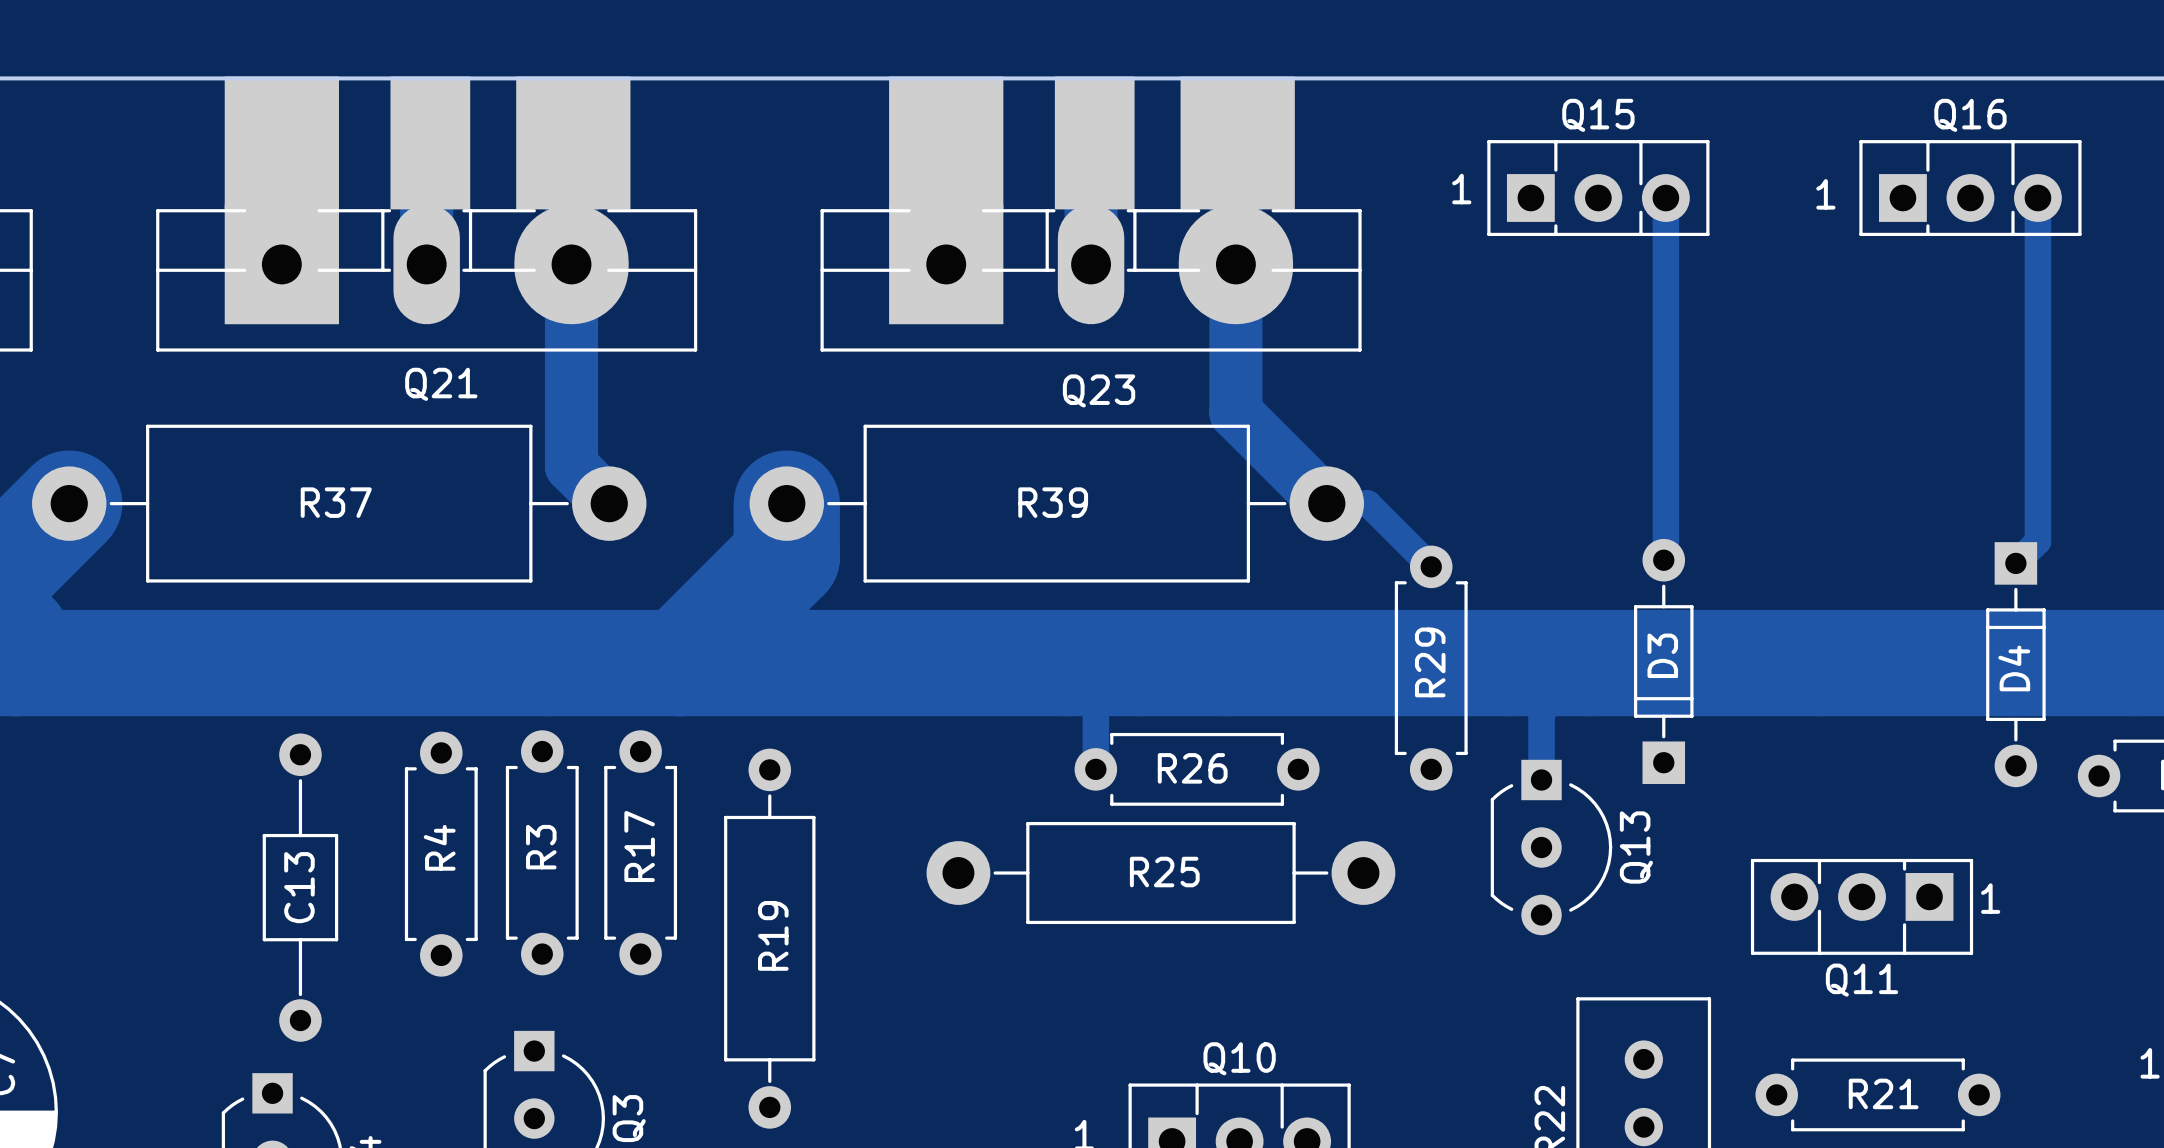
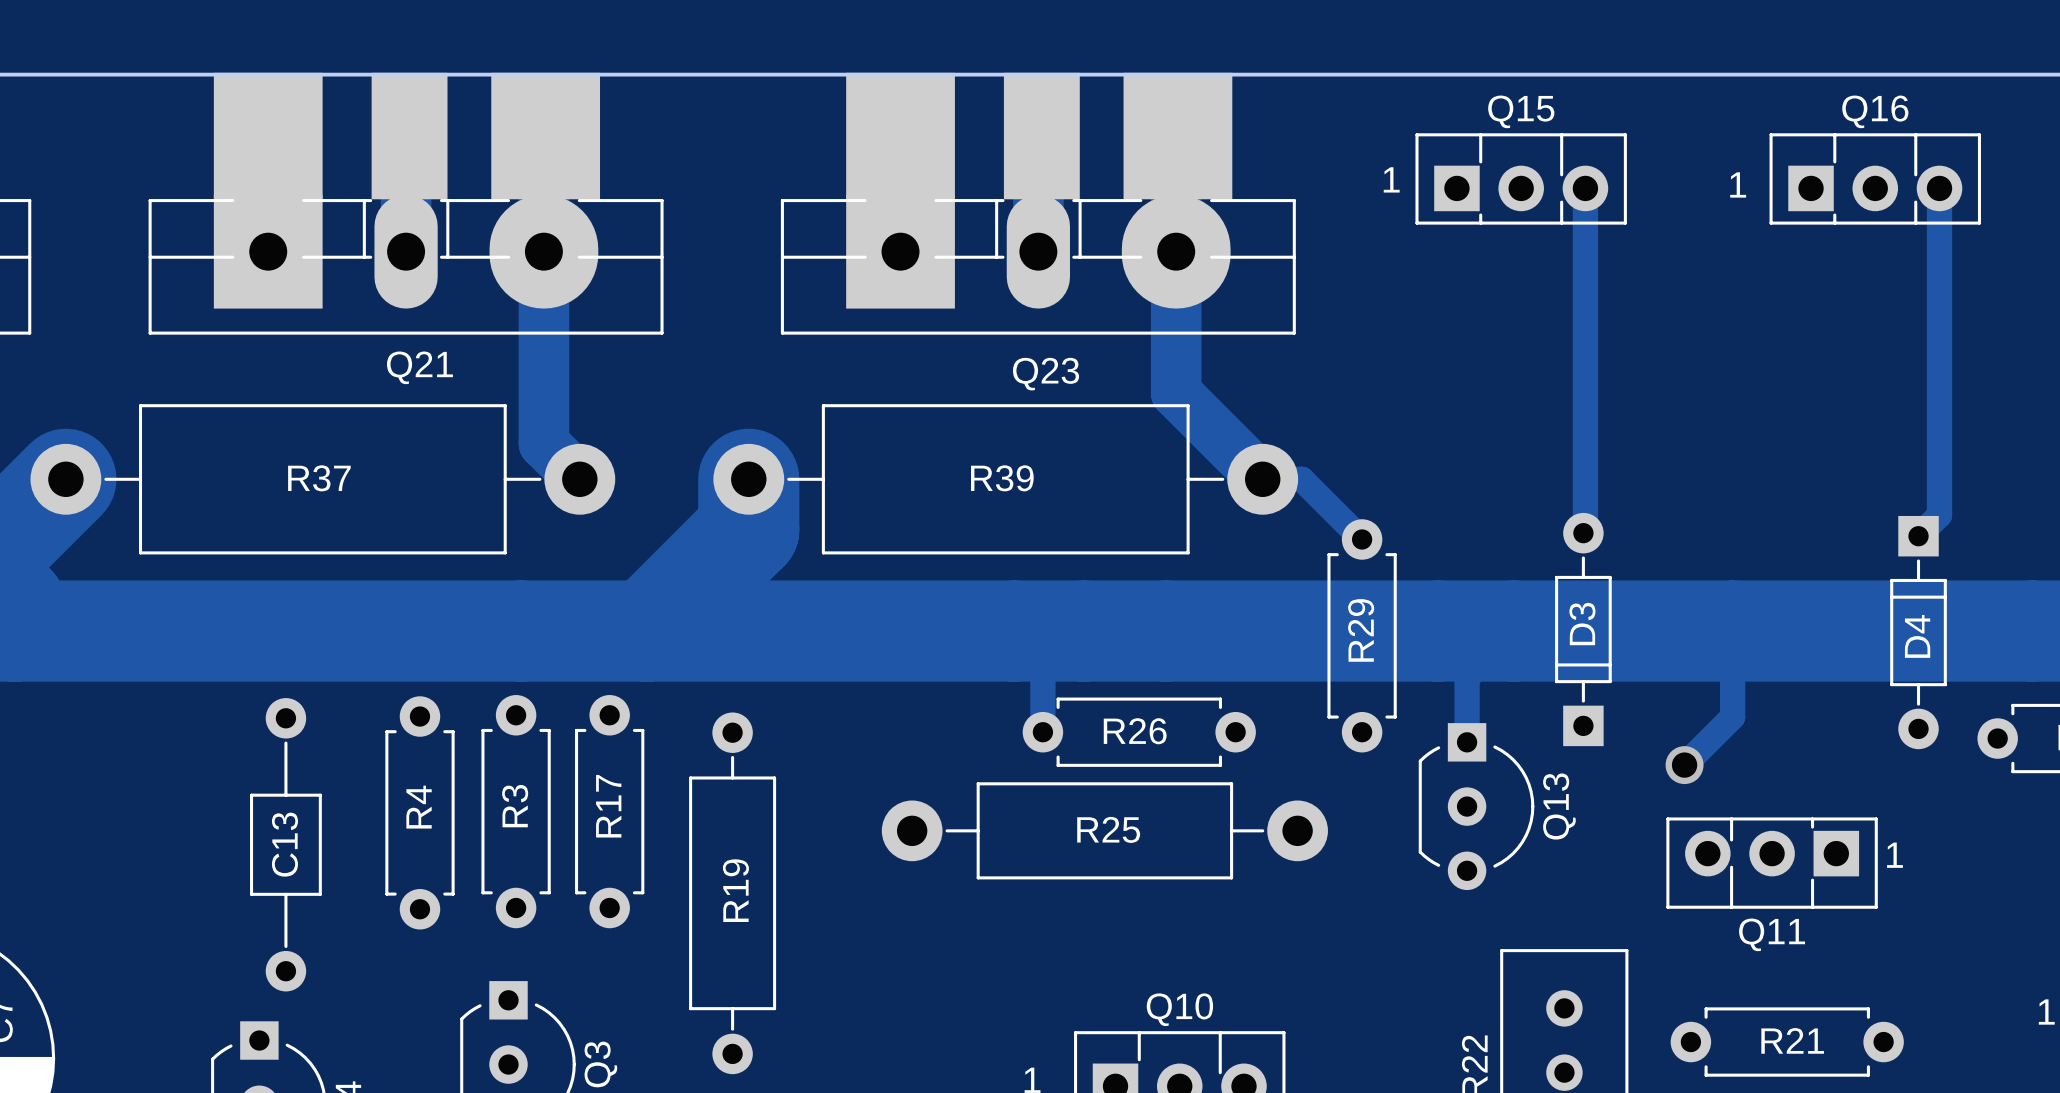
track: none -> (1732, 631) (1732, 717) (1684, 765)
via: none -> (1684, 765)

